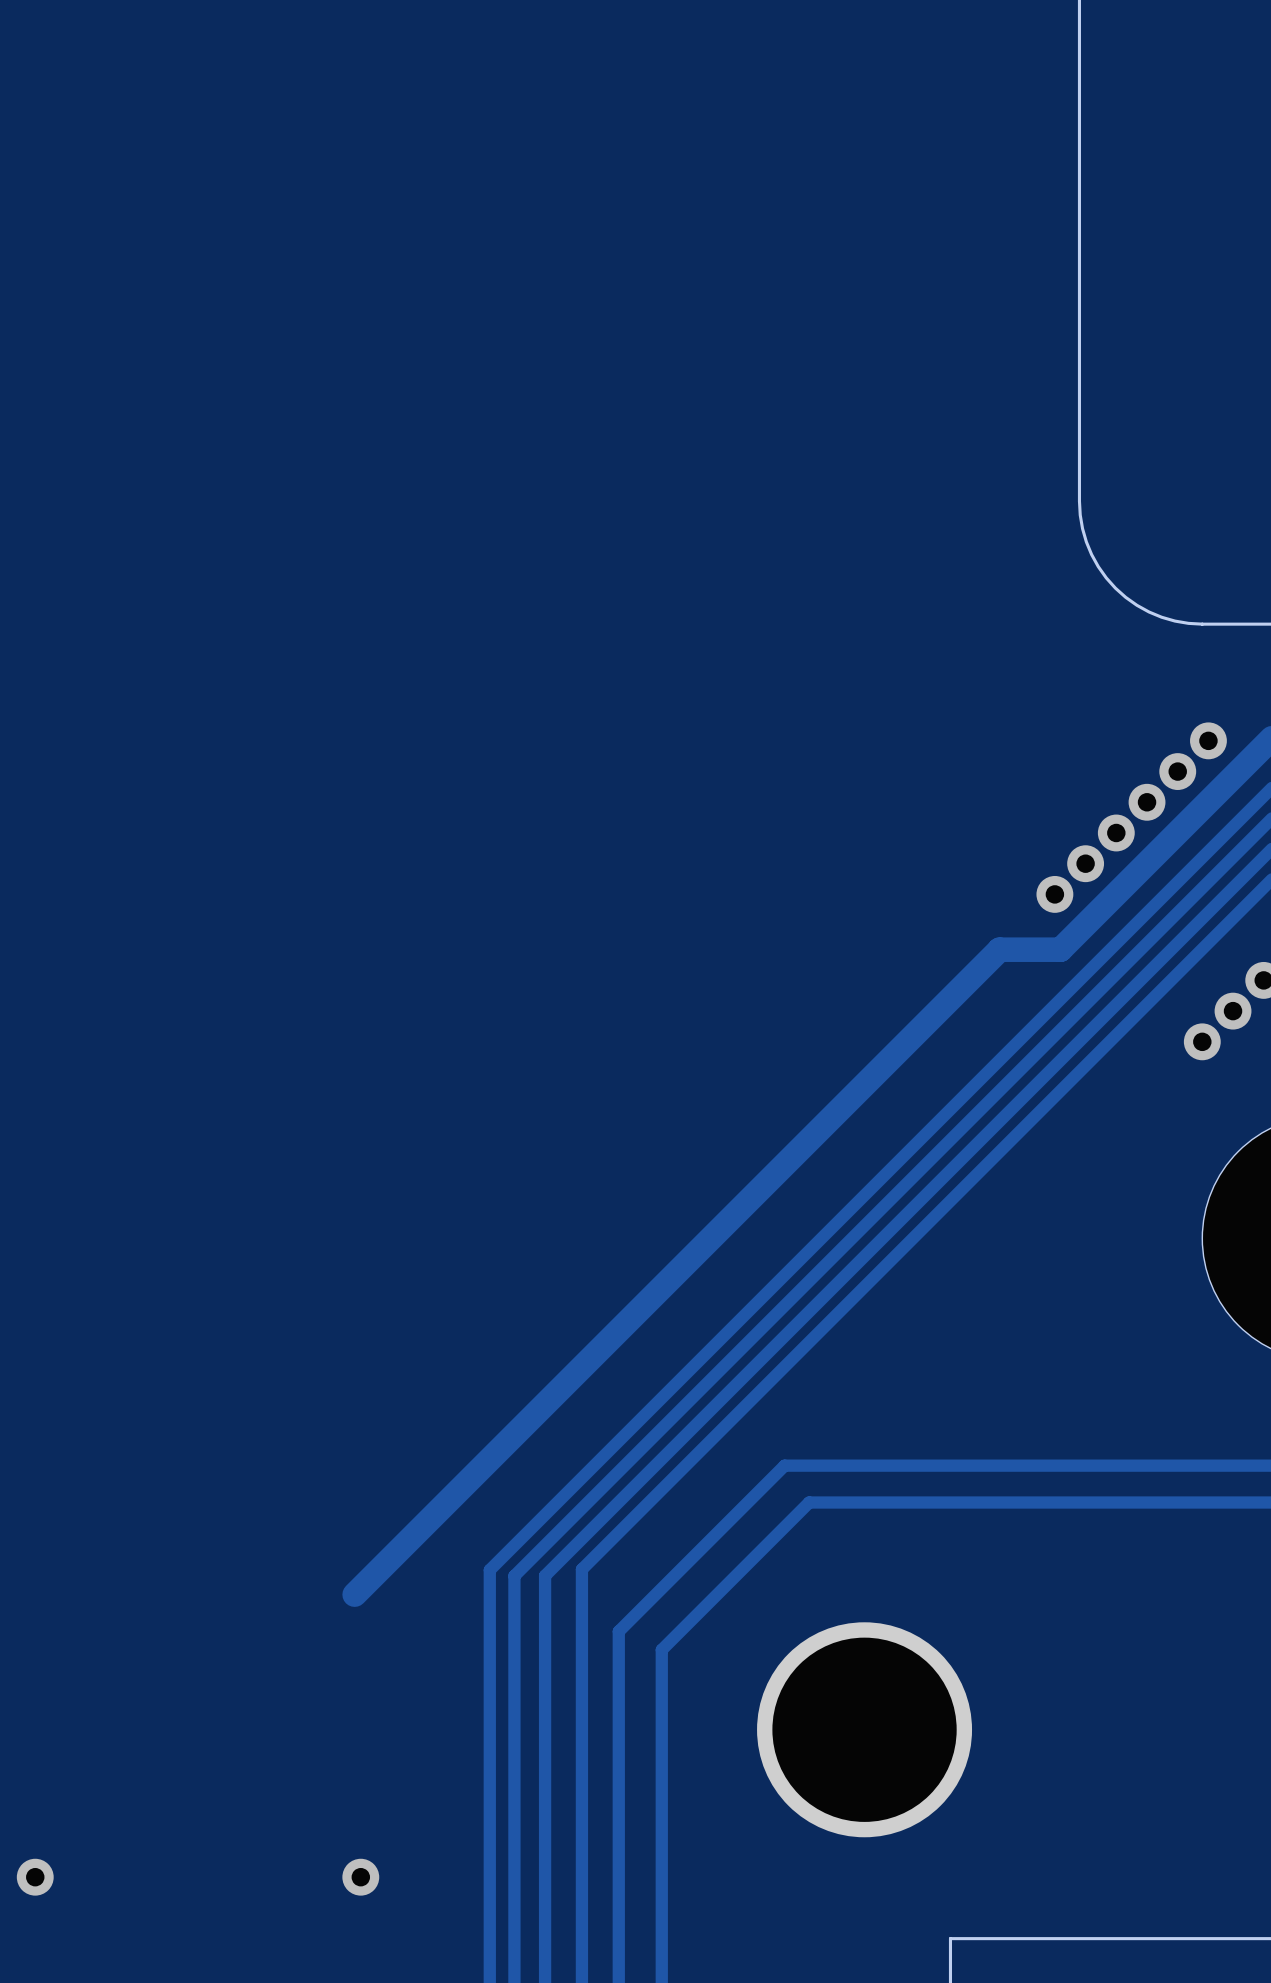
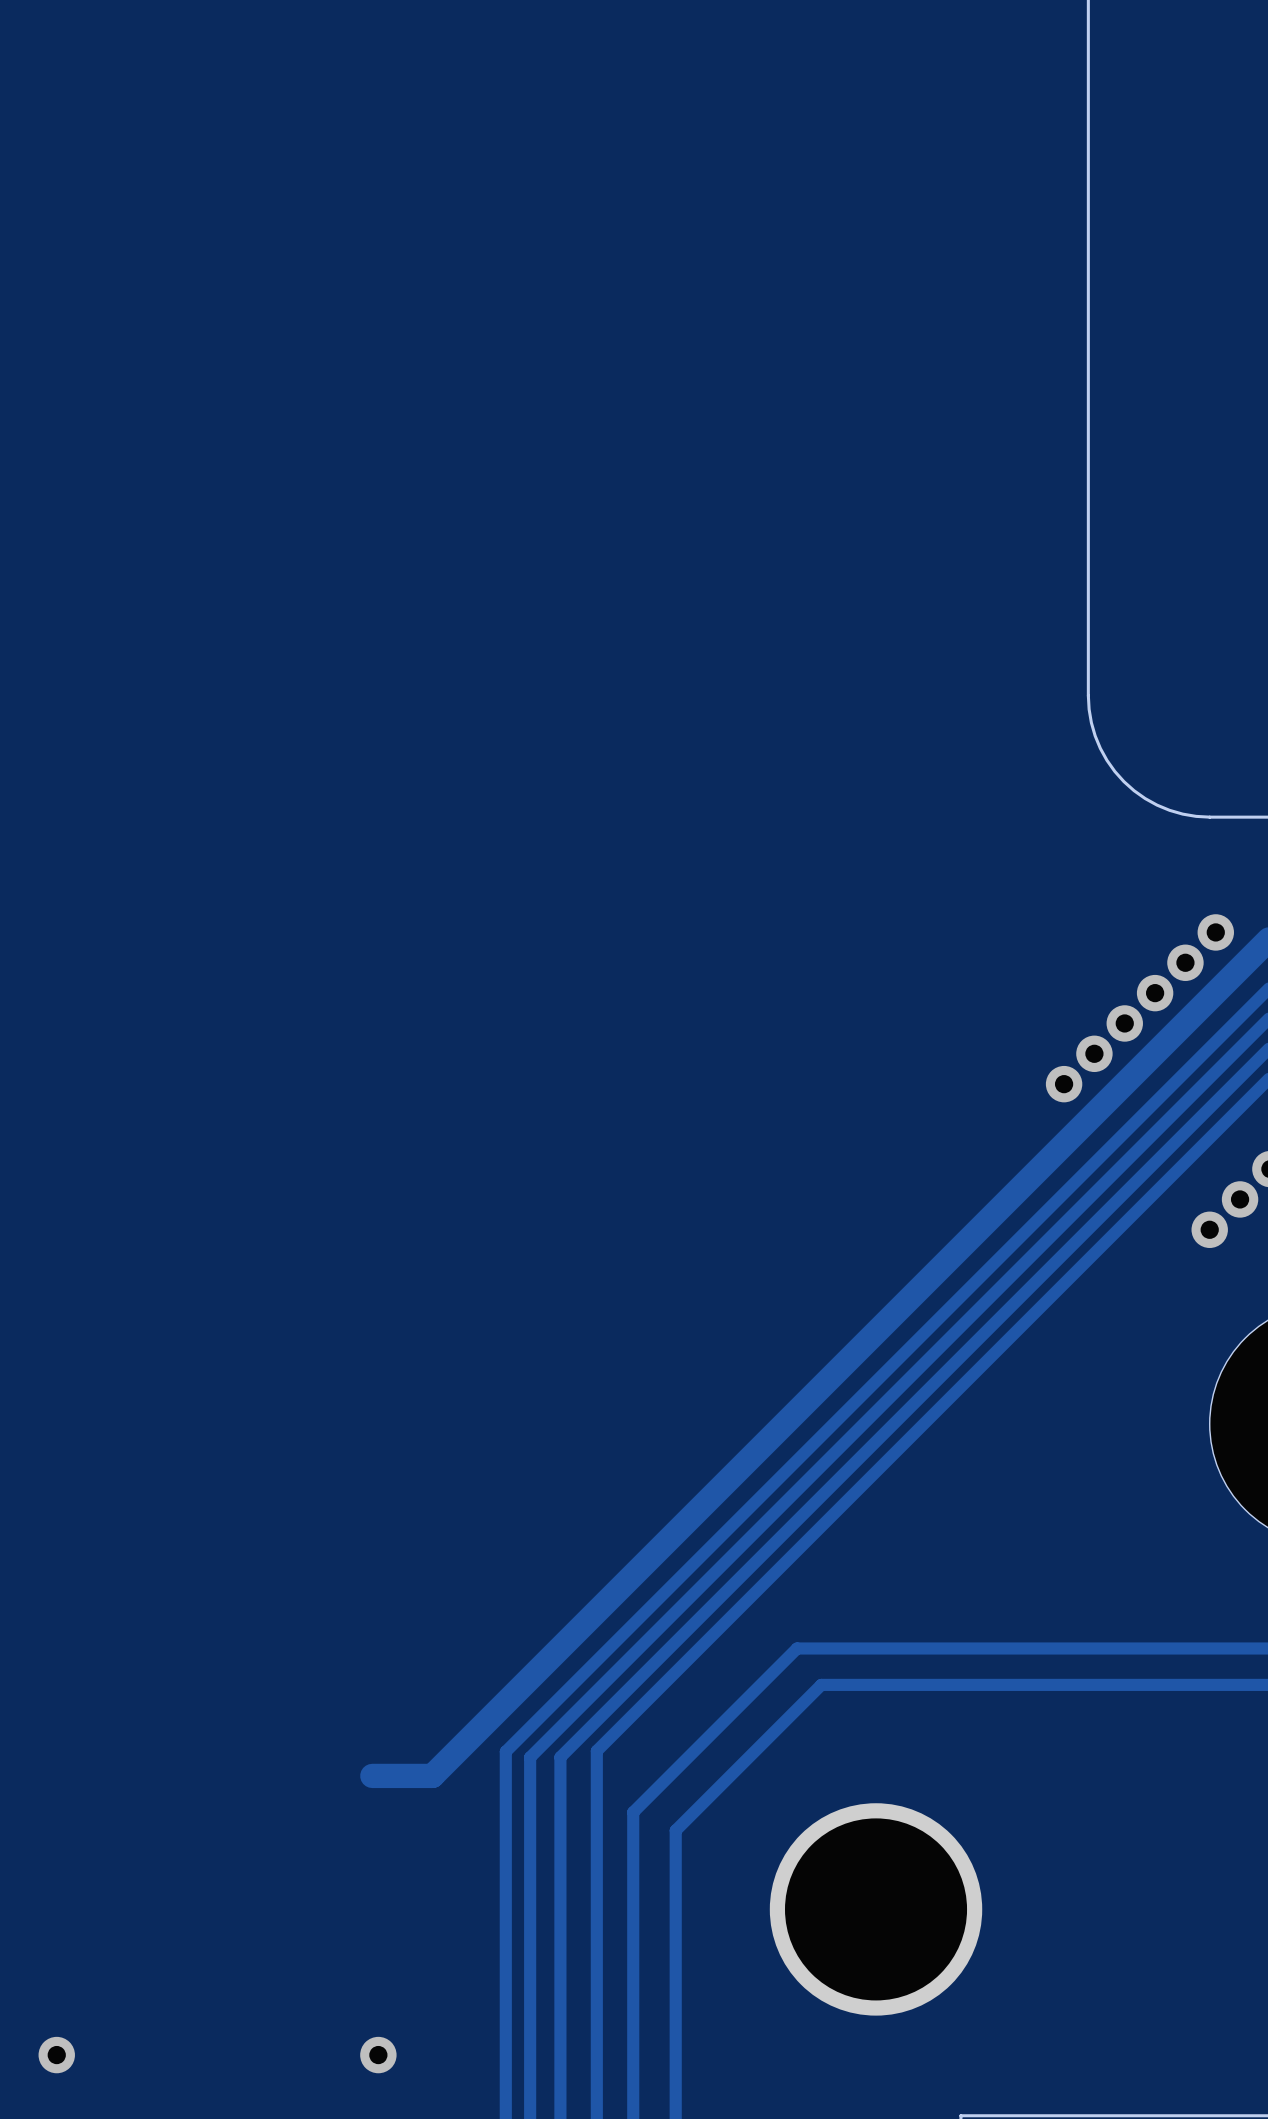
track: (1060, 949) (999, 949) (354, 1594) -> (1069, 1138) (432, 1775) (372, 1775)

